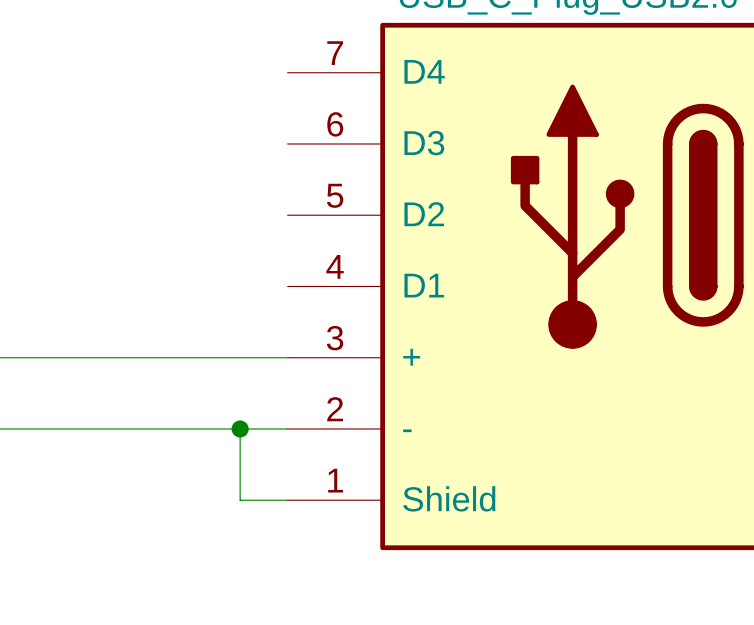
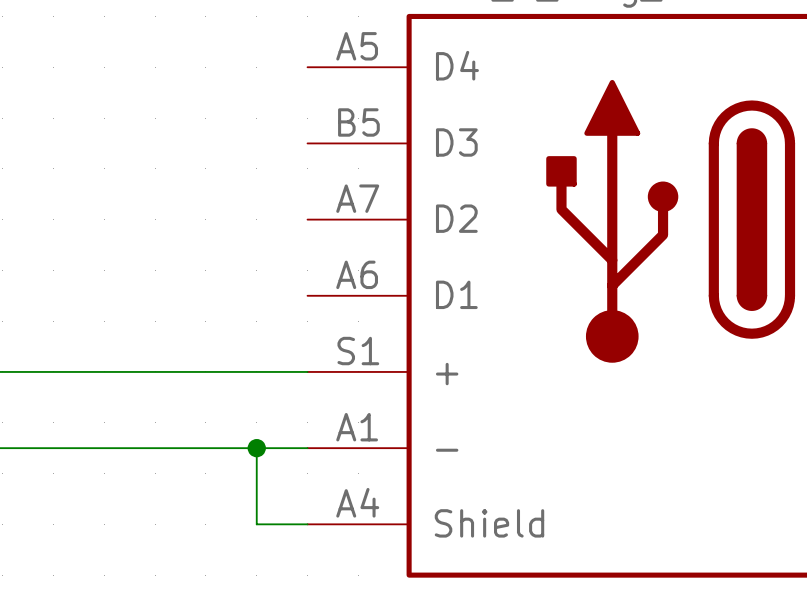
part pin number: 7 (335, 53) -> A5 (357, 46)
part pin number: 6 (335, 124) -> B5 (358, 122)
part pin number: 5 (335, 195) -> A7 (357, 198)
part pin number: 4 (335, 266) -> A6 (357, 274)
part pin number: 3 (335, 338) -> S1 (358, 351)
part pin number: 2 (335, 409) -> A1 (357, 427)
part pin number: 1 (335, 480) -> A4 (357, 502)

